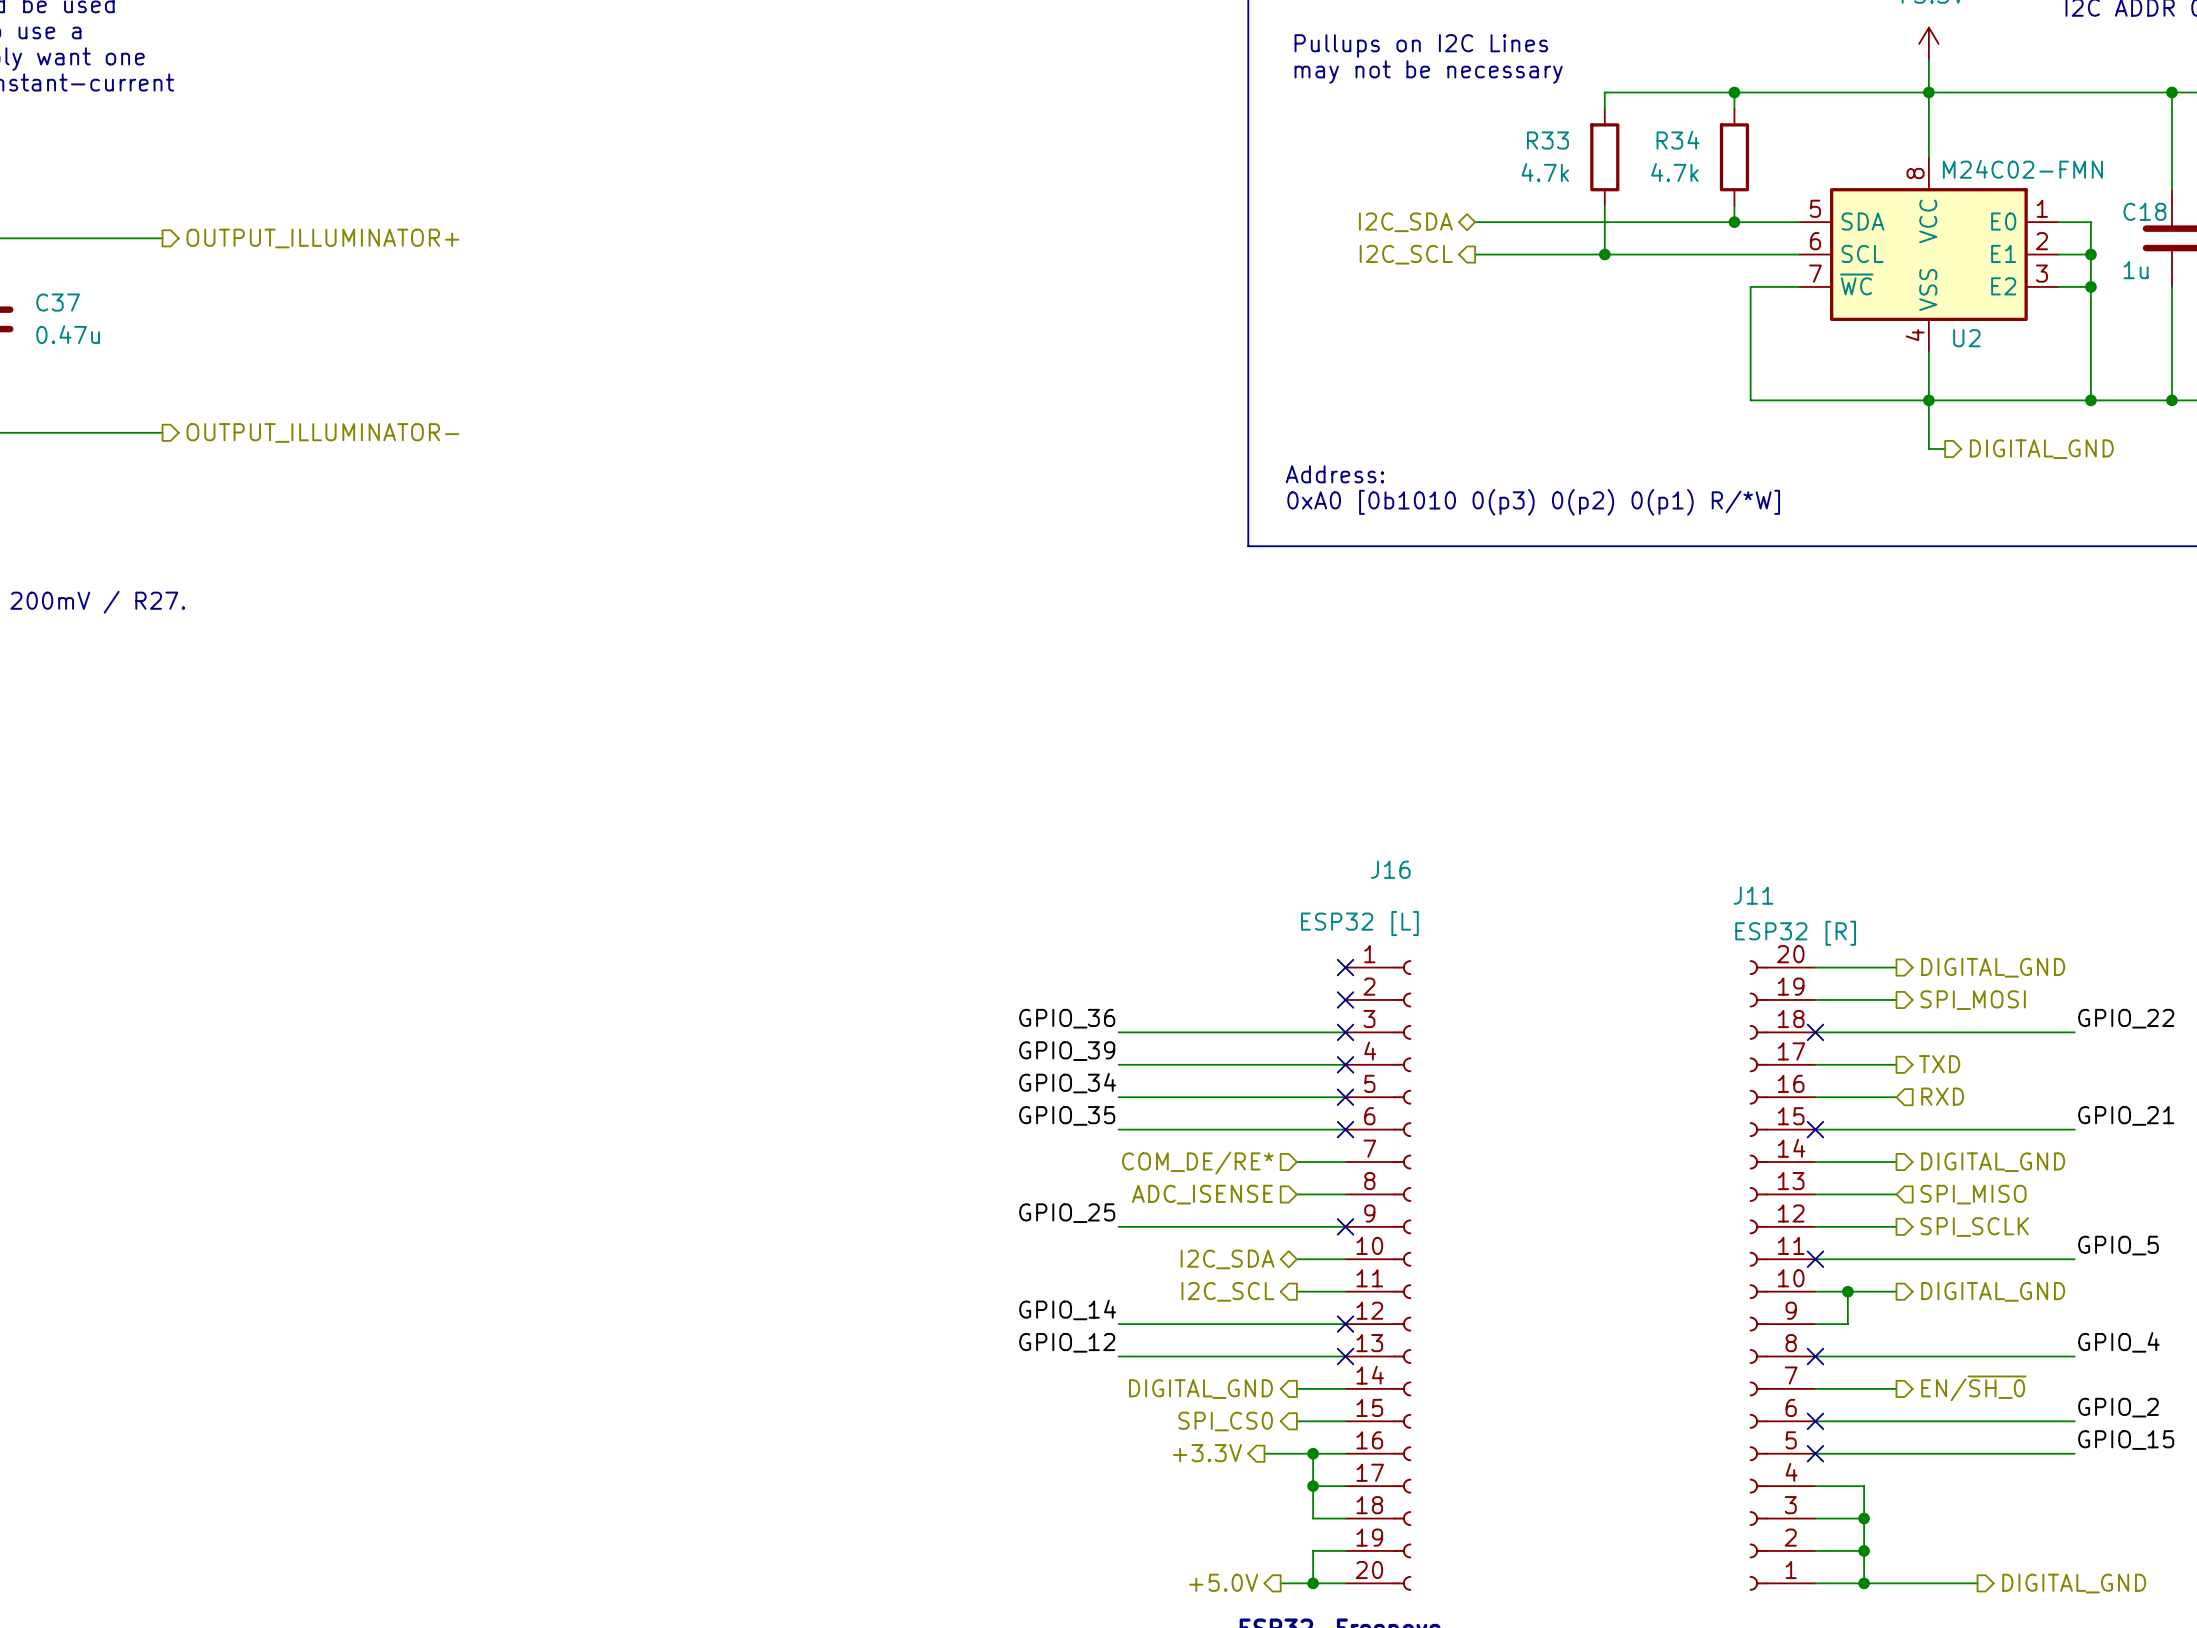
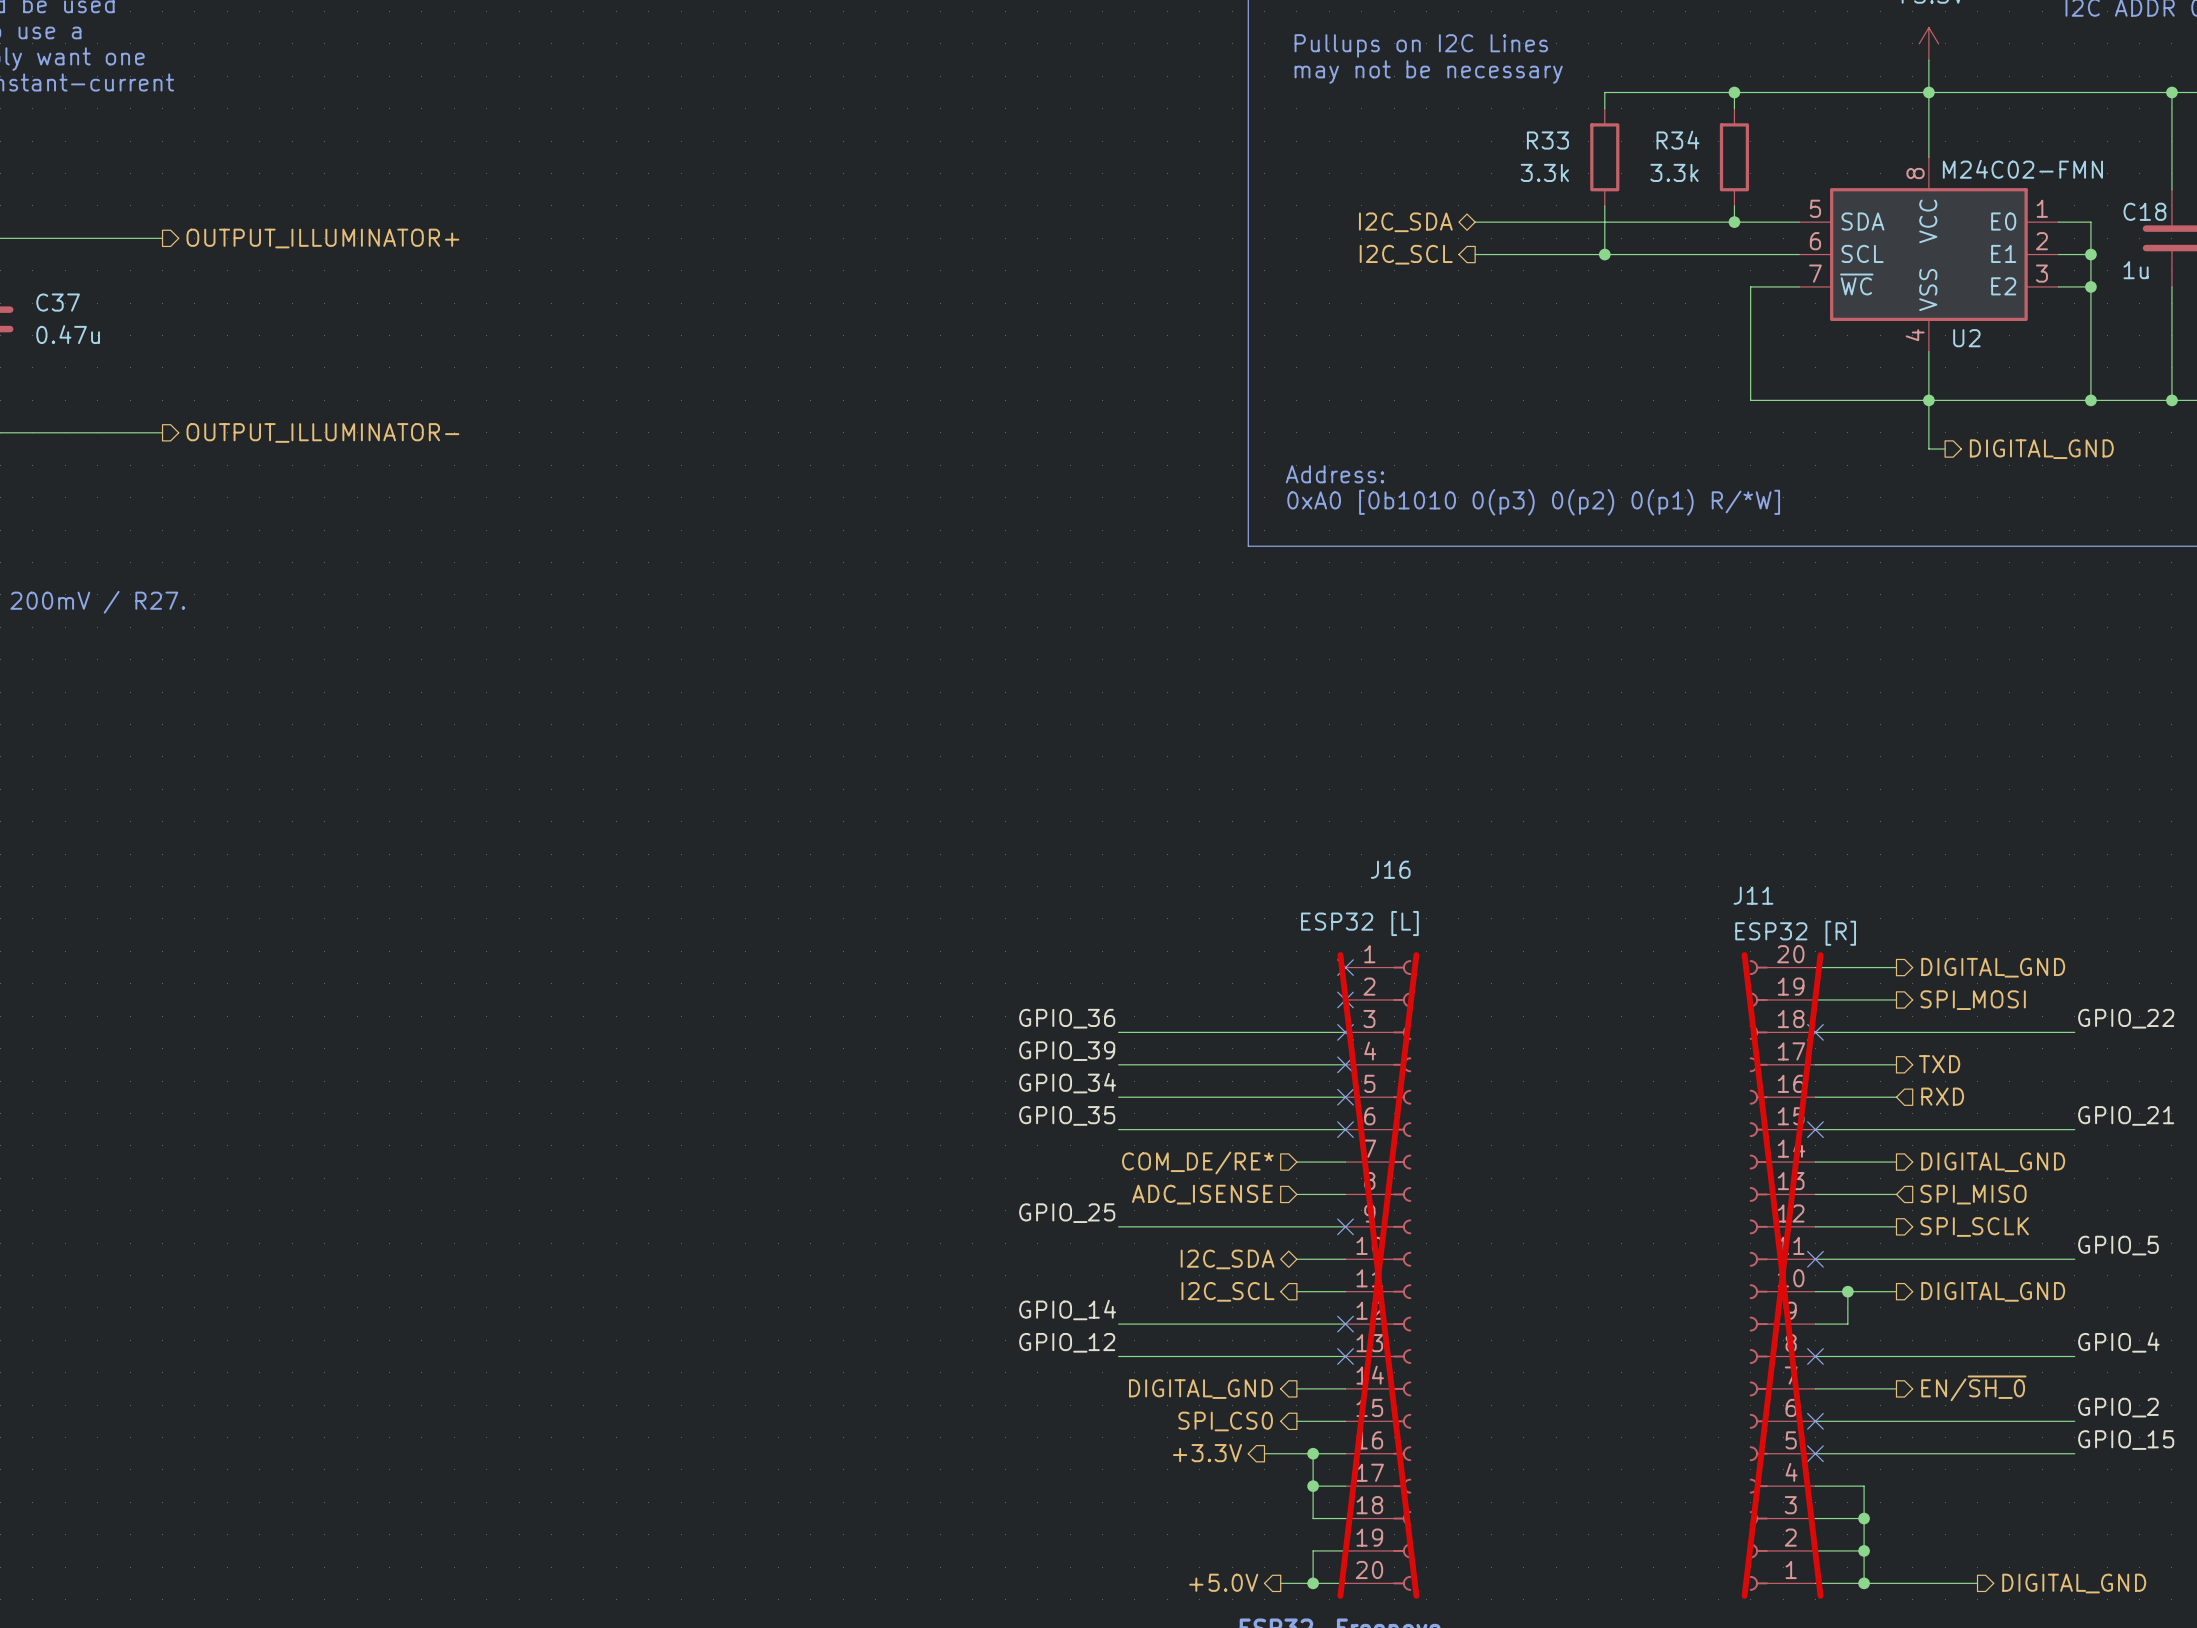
R33 value: 4.7k (1545, 172) -> 3.3k (1544, 172)
R34 value: 4.7k (1674, 172) -> 3.3k (1674, 172)
J16 do-not-place cross: none -> (1378, 1275)
J11 do-not-place cross: none -> (1782, 1275)

